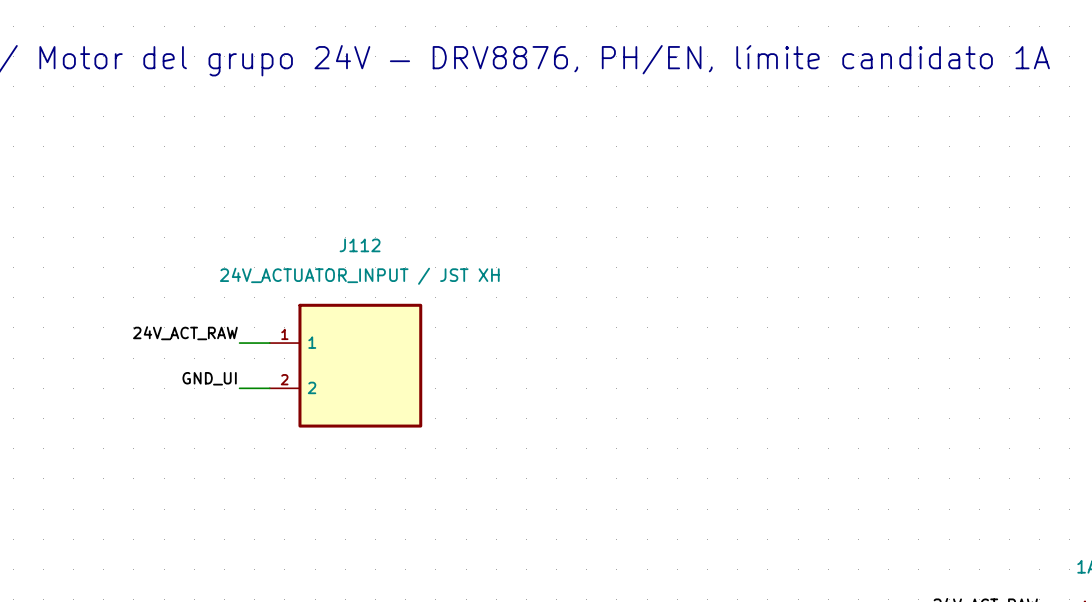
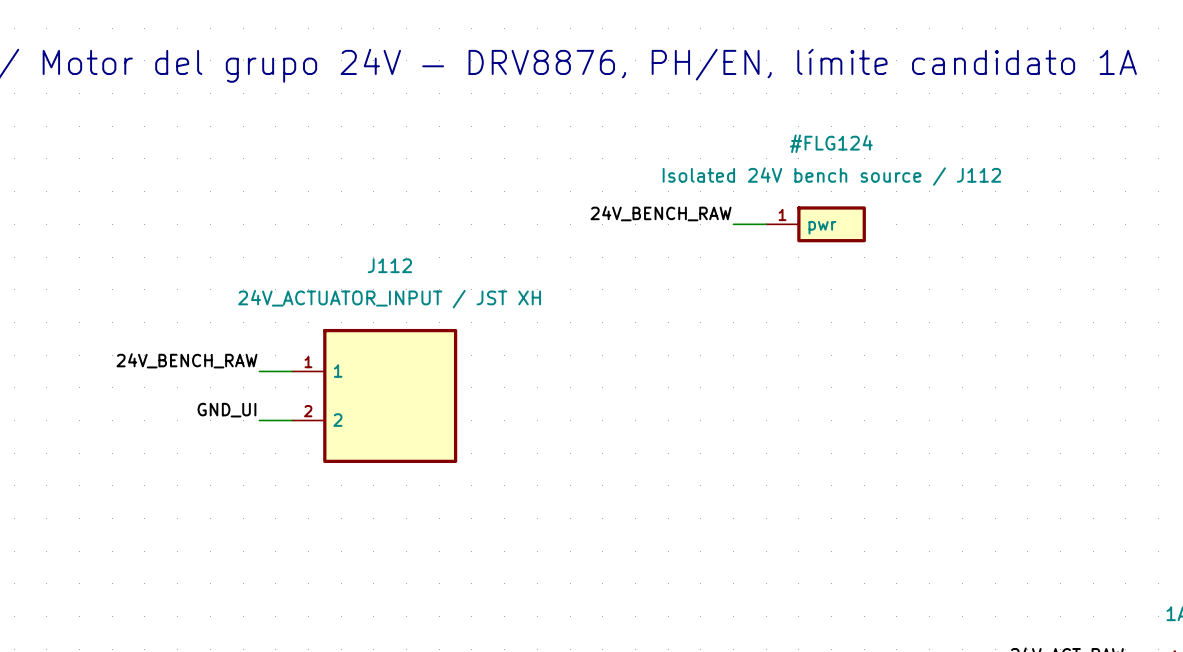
label: none -> 24V_BENCH_RAW (661, 213)
wire: none -> (733, 224) (766, 224)
#FLG124: none -> Isolated 24V bench source / J112 (816, 224)
label: 24V_ACT_RAW (185, 333) -> 24V_BENCH_RAW (186, 360)

